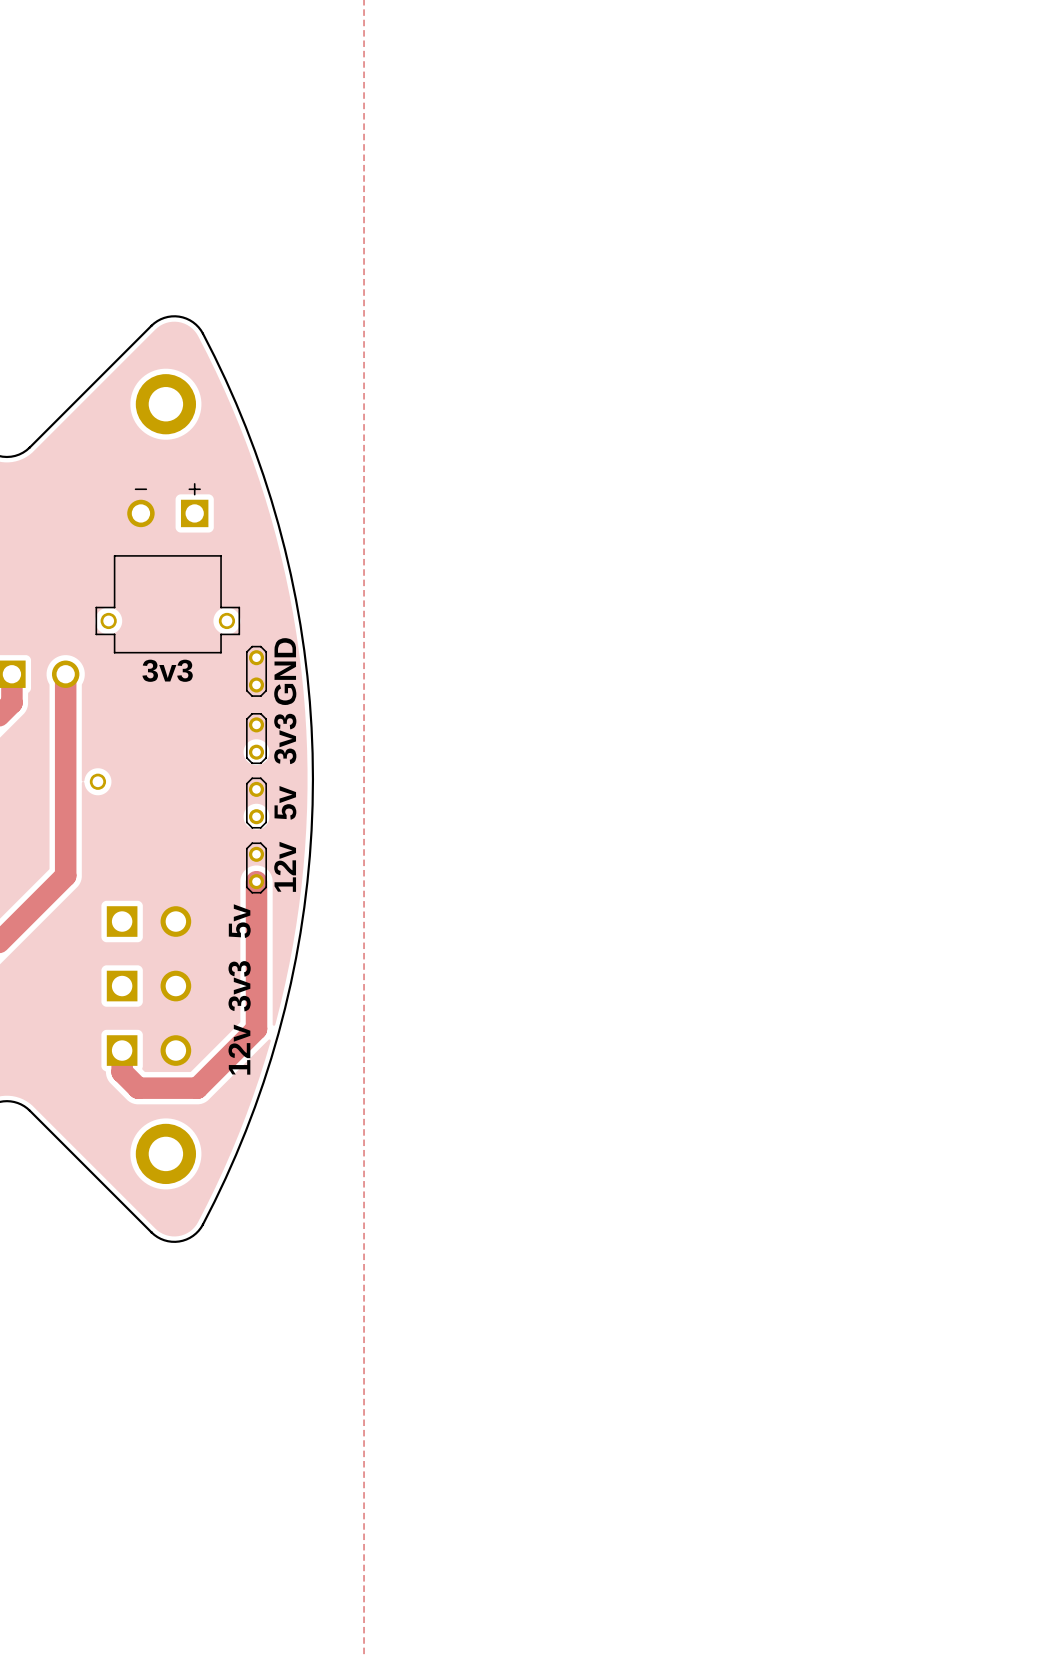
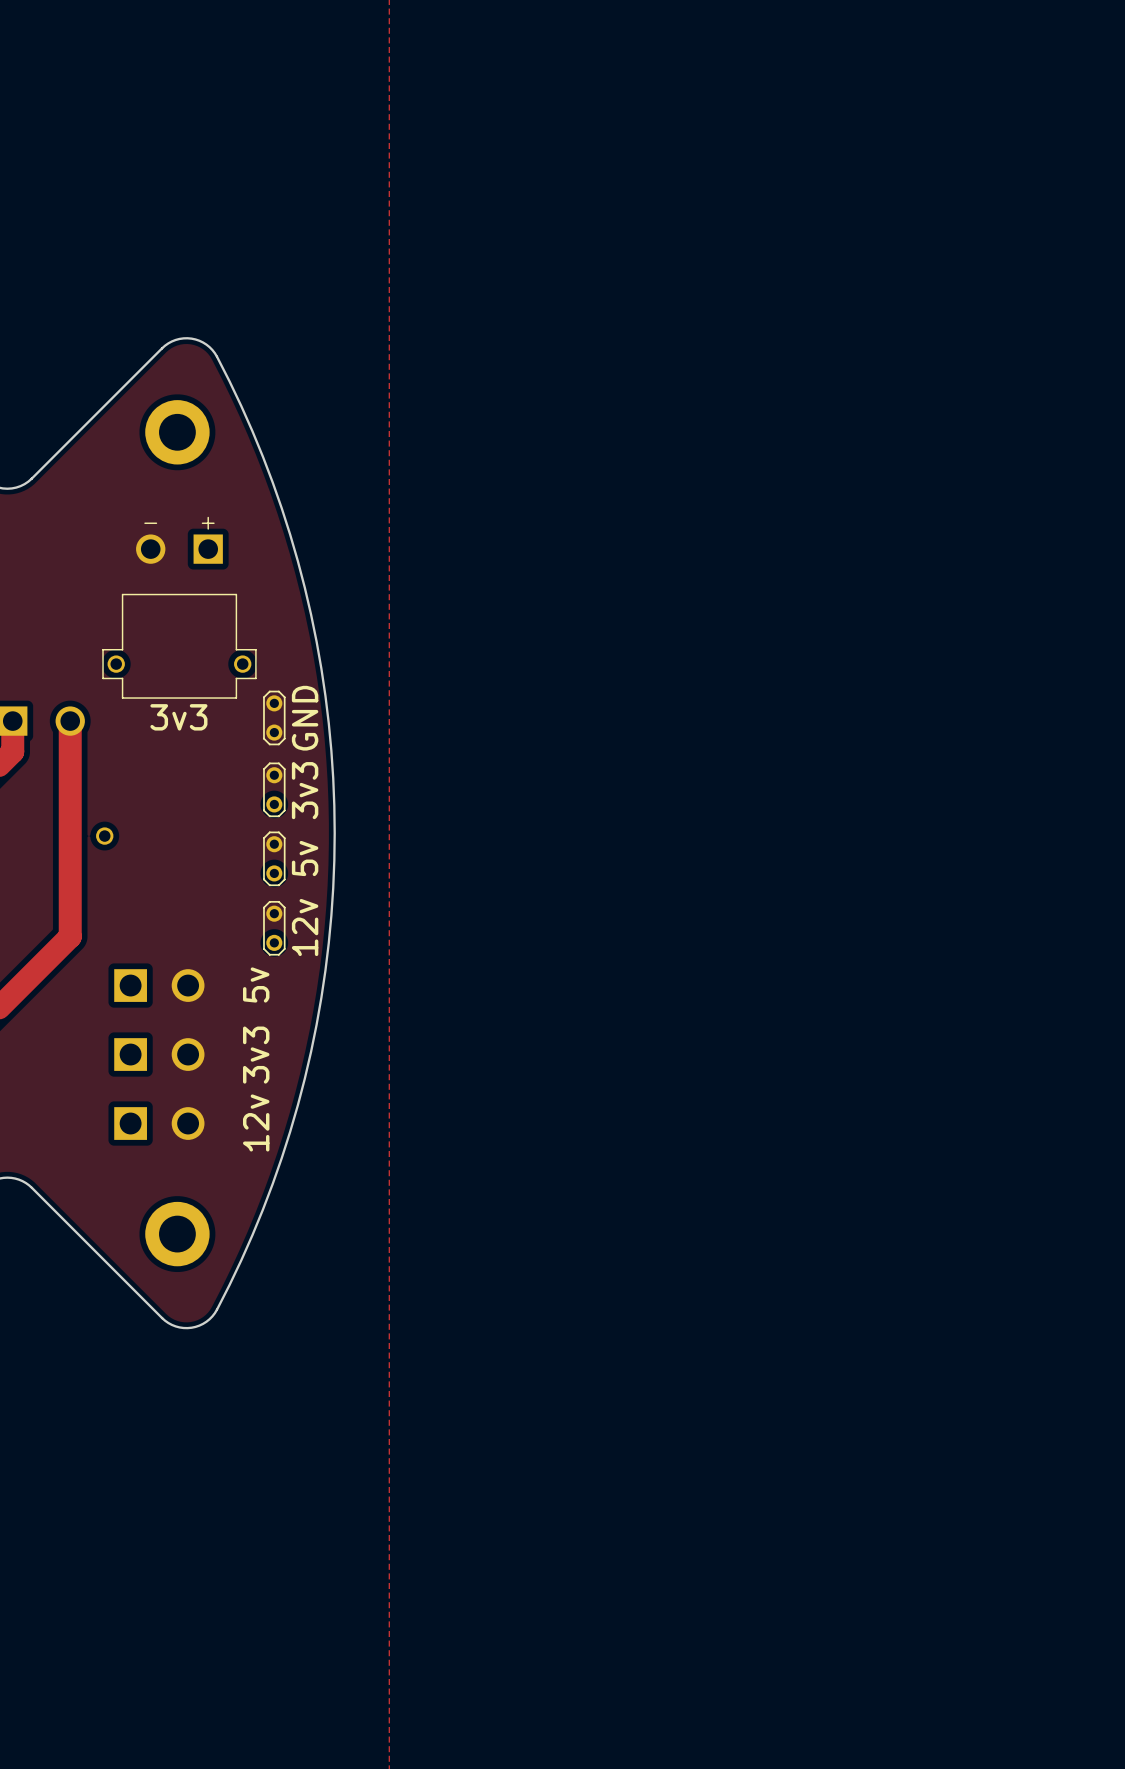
track: (256, 881) (256, 1029) (197, 1088) (138, 1088) (122, 1072) (122, 1050) -> none

